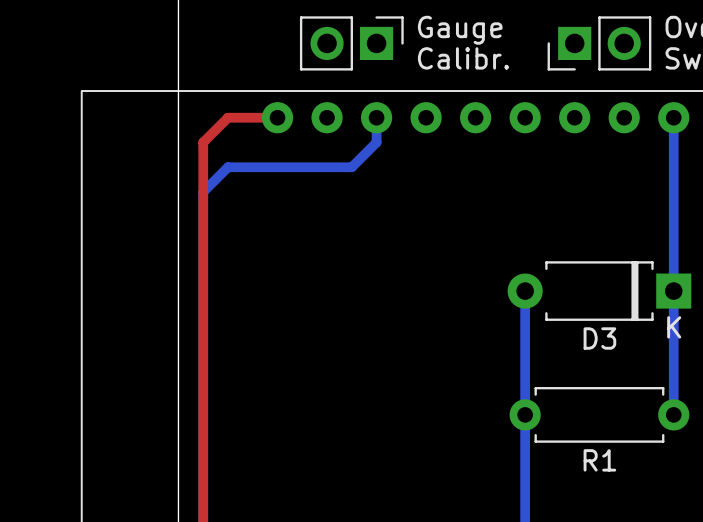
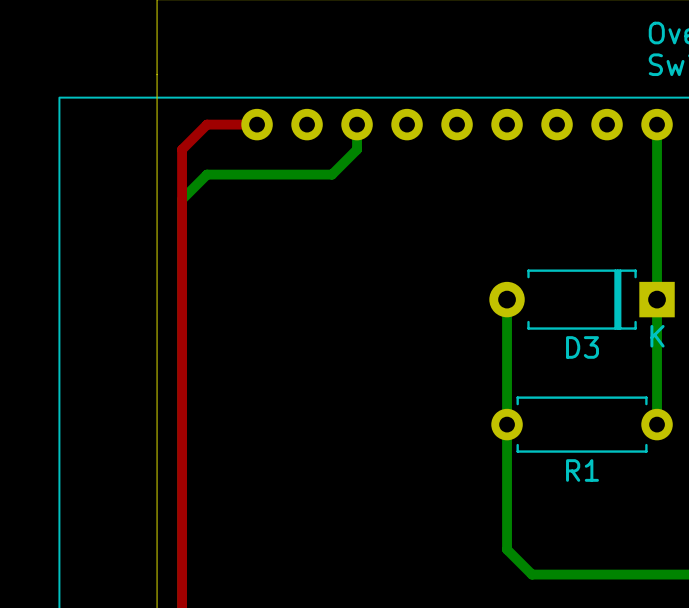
text: Gauge (460, 30) -> none
part: (351, 43) -> none
part: (599, 43) -> none
text: Calibr. (463, 58) -> none

